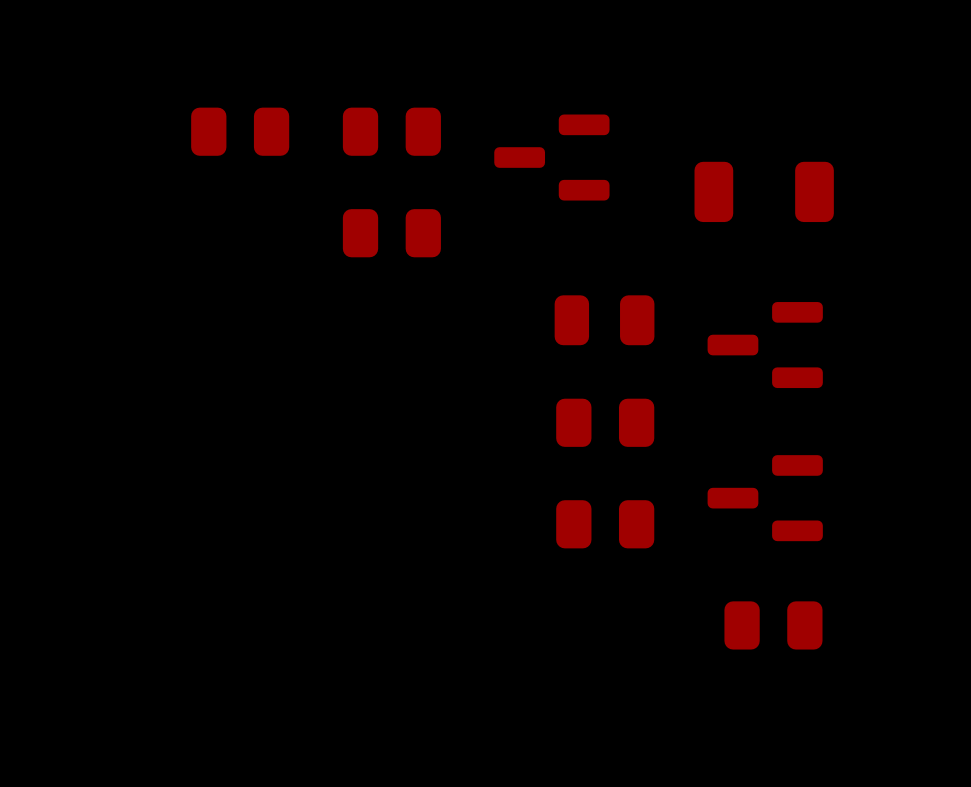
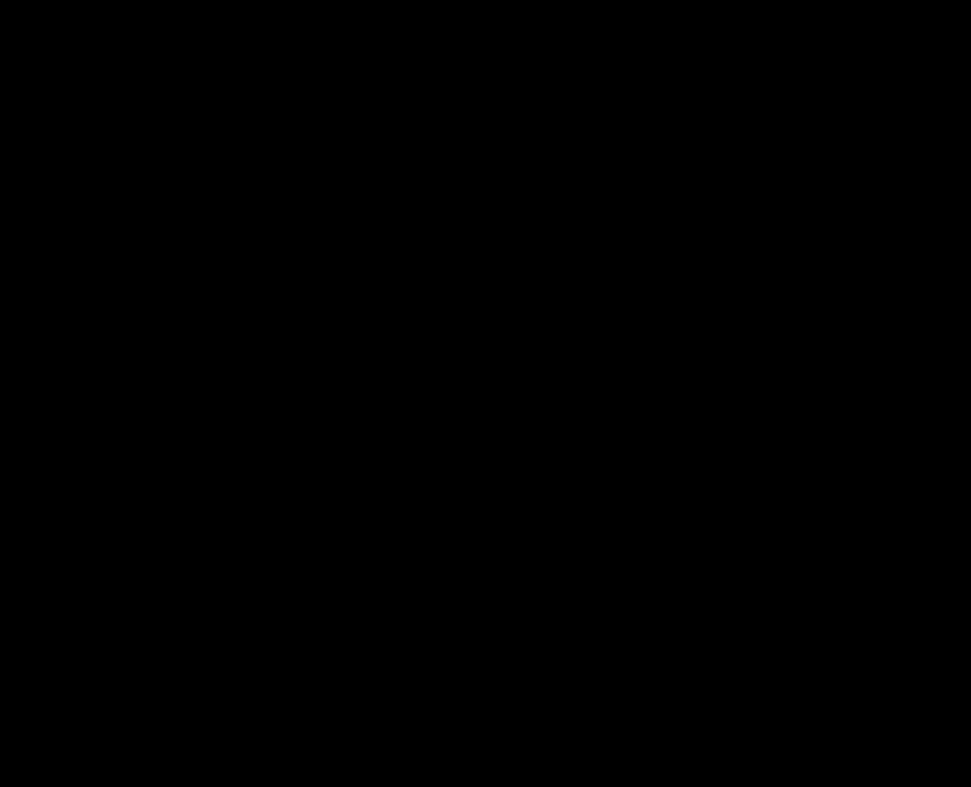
part: (240, 131) -> none
part: (391, 131) -> none
part: (551, 157) -> none
part: (764, 191) -> none
part: (391, 233) -> none
part: (604, 320) -> none
part: (765, 345) -> none
part: (605, 422) -> none
part: (765, 498) -> none
part: (605, 524) -> none
part: (773, 625) -> none

